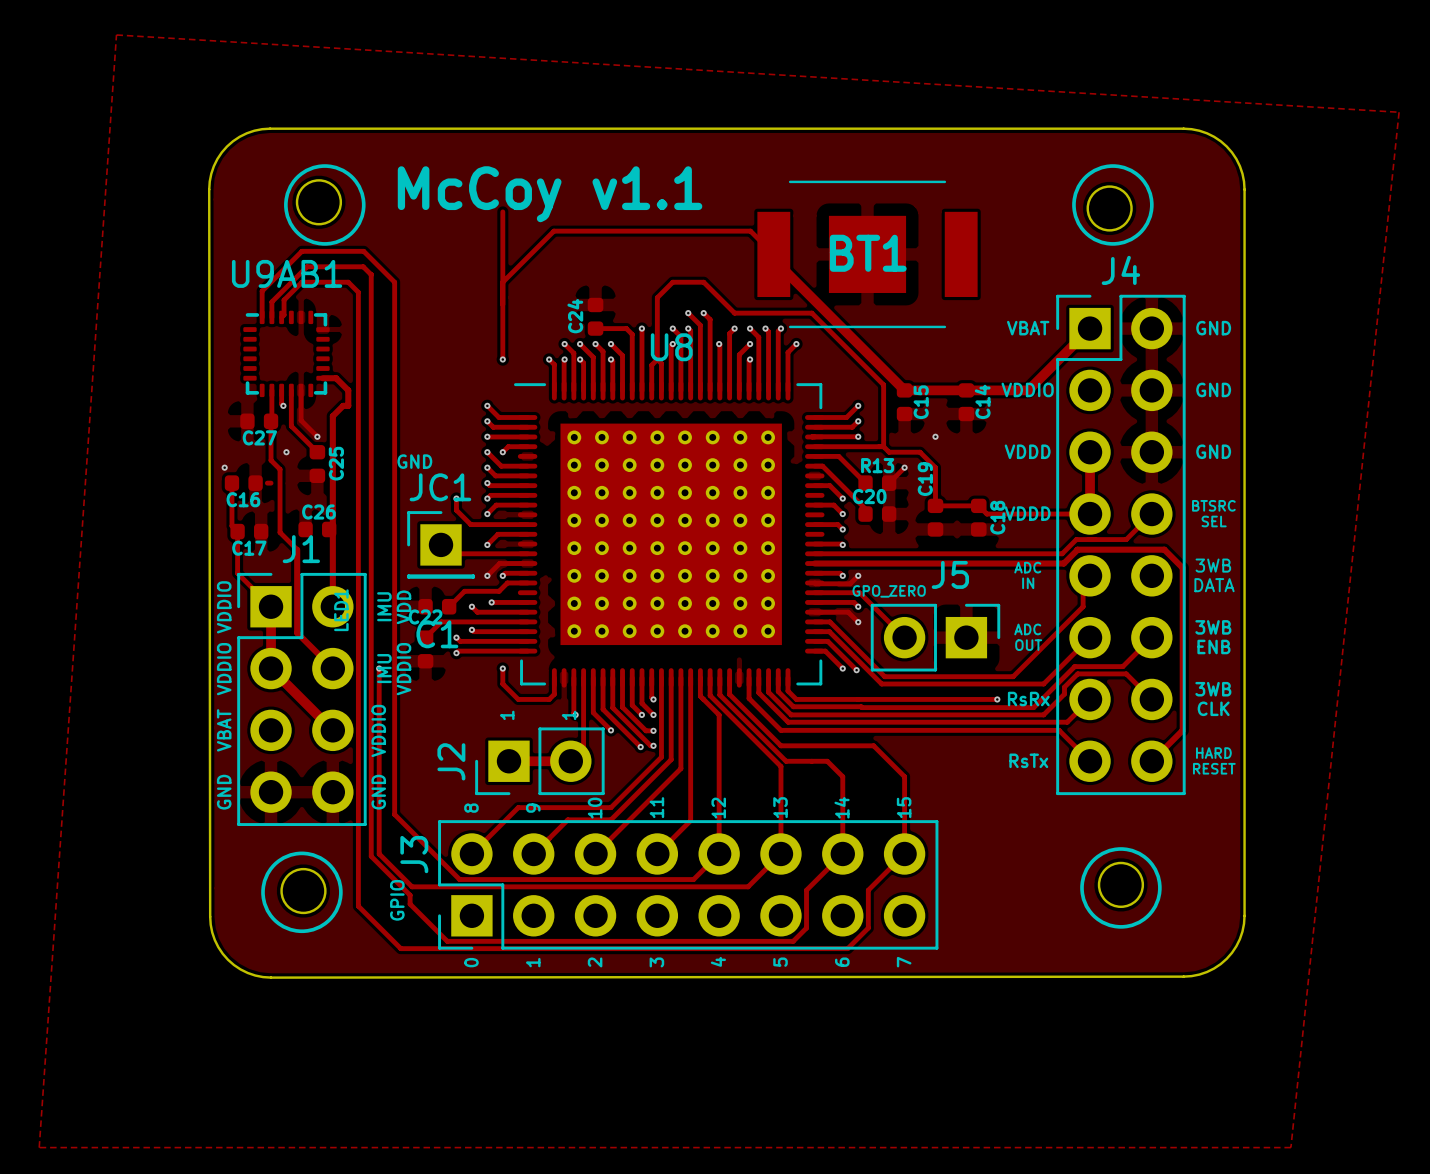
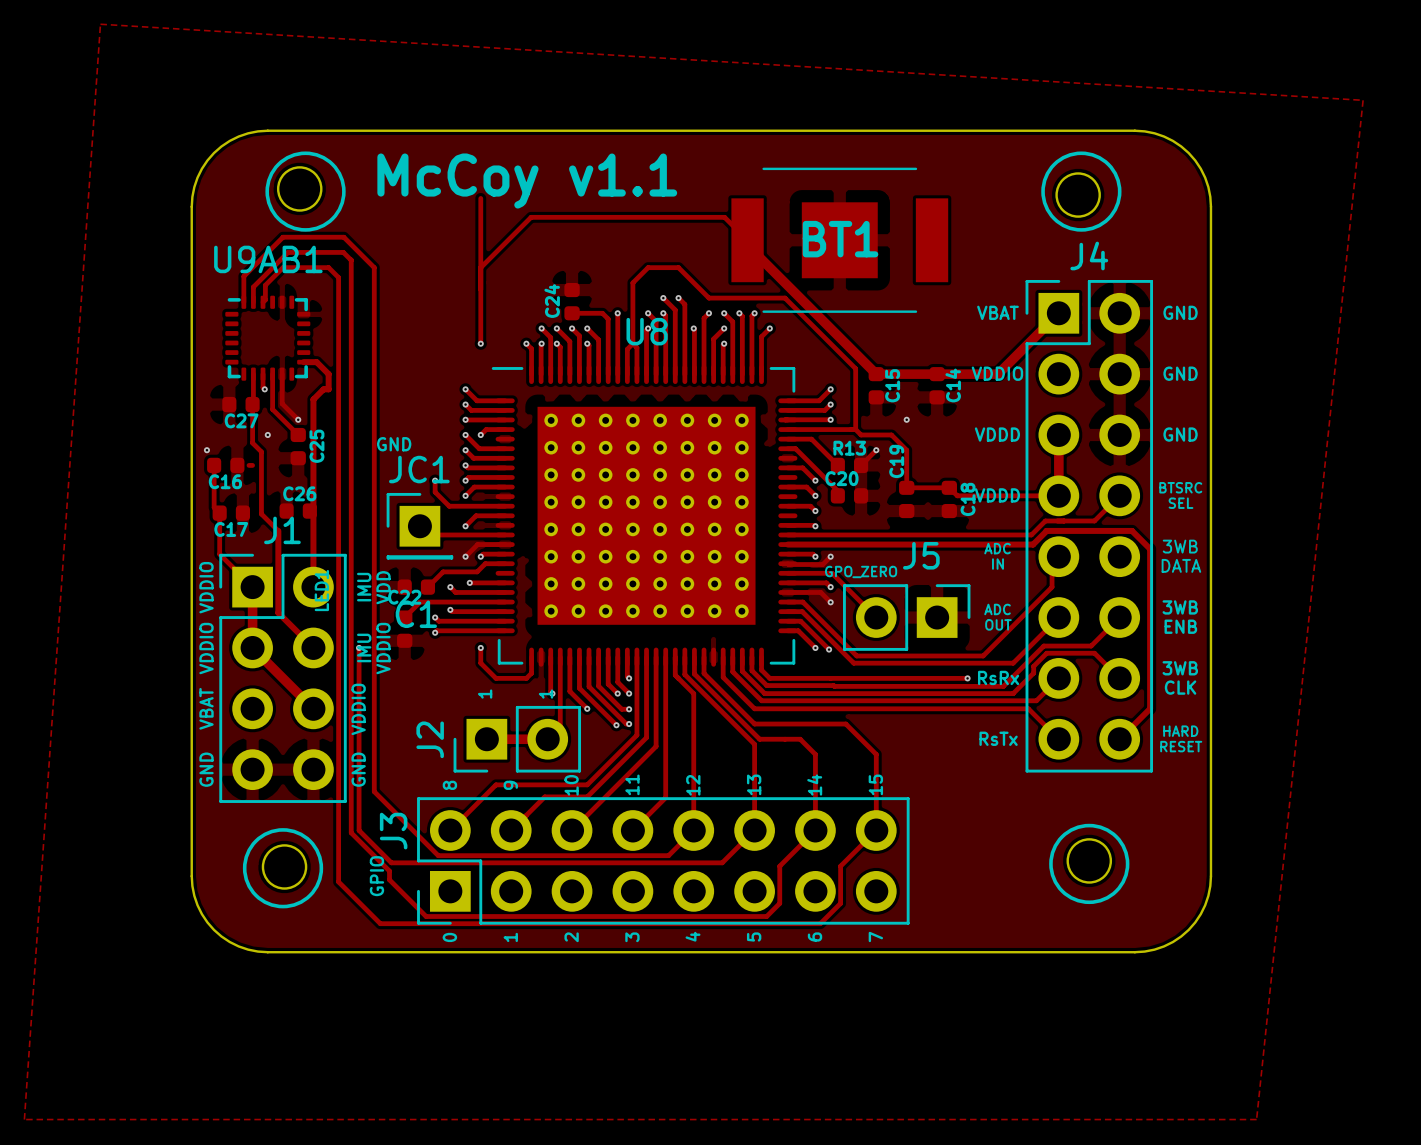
board edge: (1244, 220) (1244, 181) (1236, 159) (1226, 146) (1214, 136) (1199, 130) (1183, 128) (270, 128) (246, 133) (227, 146) (213, 166) (209, 189) (210, 916) (212, 932) (218, 947) (233, 965) (255, 975) (271, 977) (1183, 976) (1206, 972) (1220, 964) (1231, 952) (1242, 931) (1244, 900) -> (1210, 206) (1205, 177) (1188, 153) (1164, 136) (1134, 130) (257, 131) (229, 140) (207, 160) (194, 187) (191, 206) (191, 876) (194, 895) (201, 914) (214, 929) (229, 942) (248, 949) (267, 952) (1144, 951) (1164, 946) (1188, 929) (1205, 905) (1210, 876)

